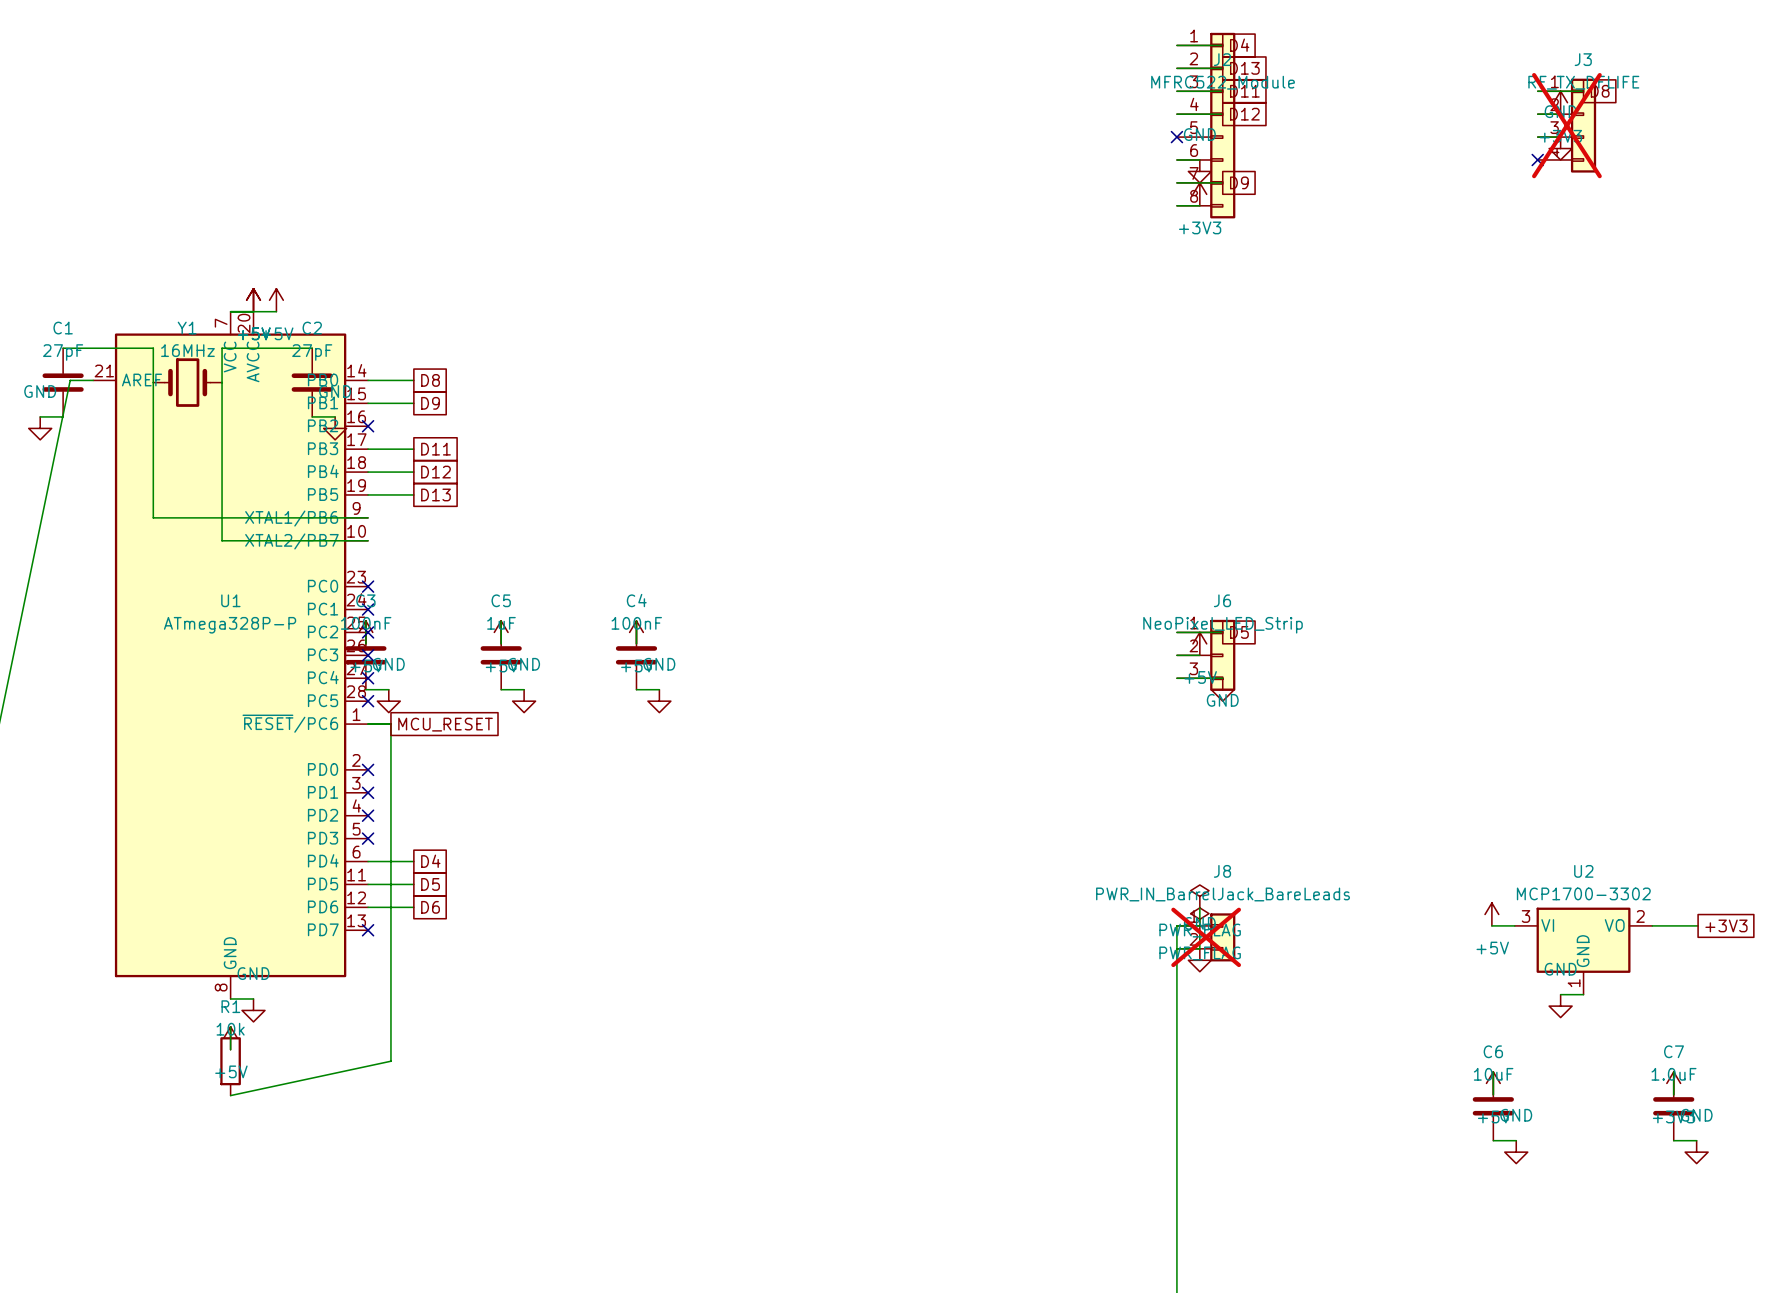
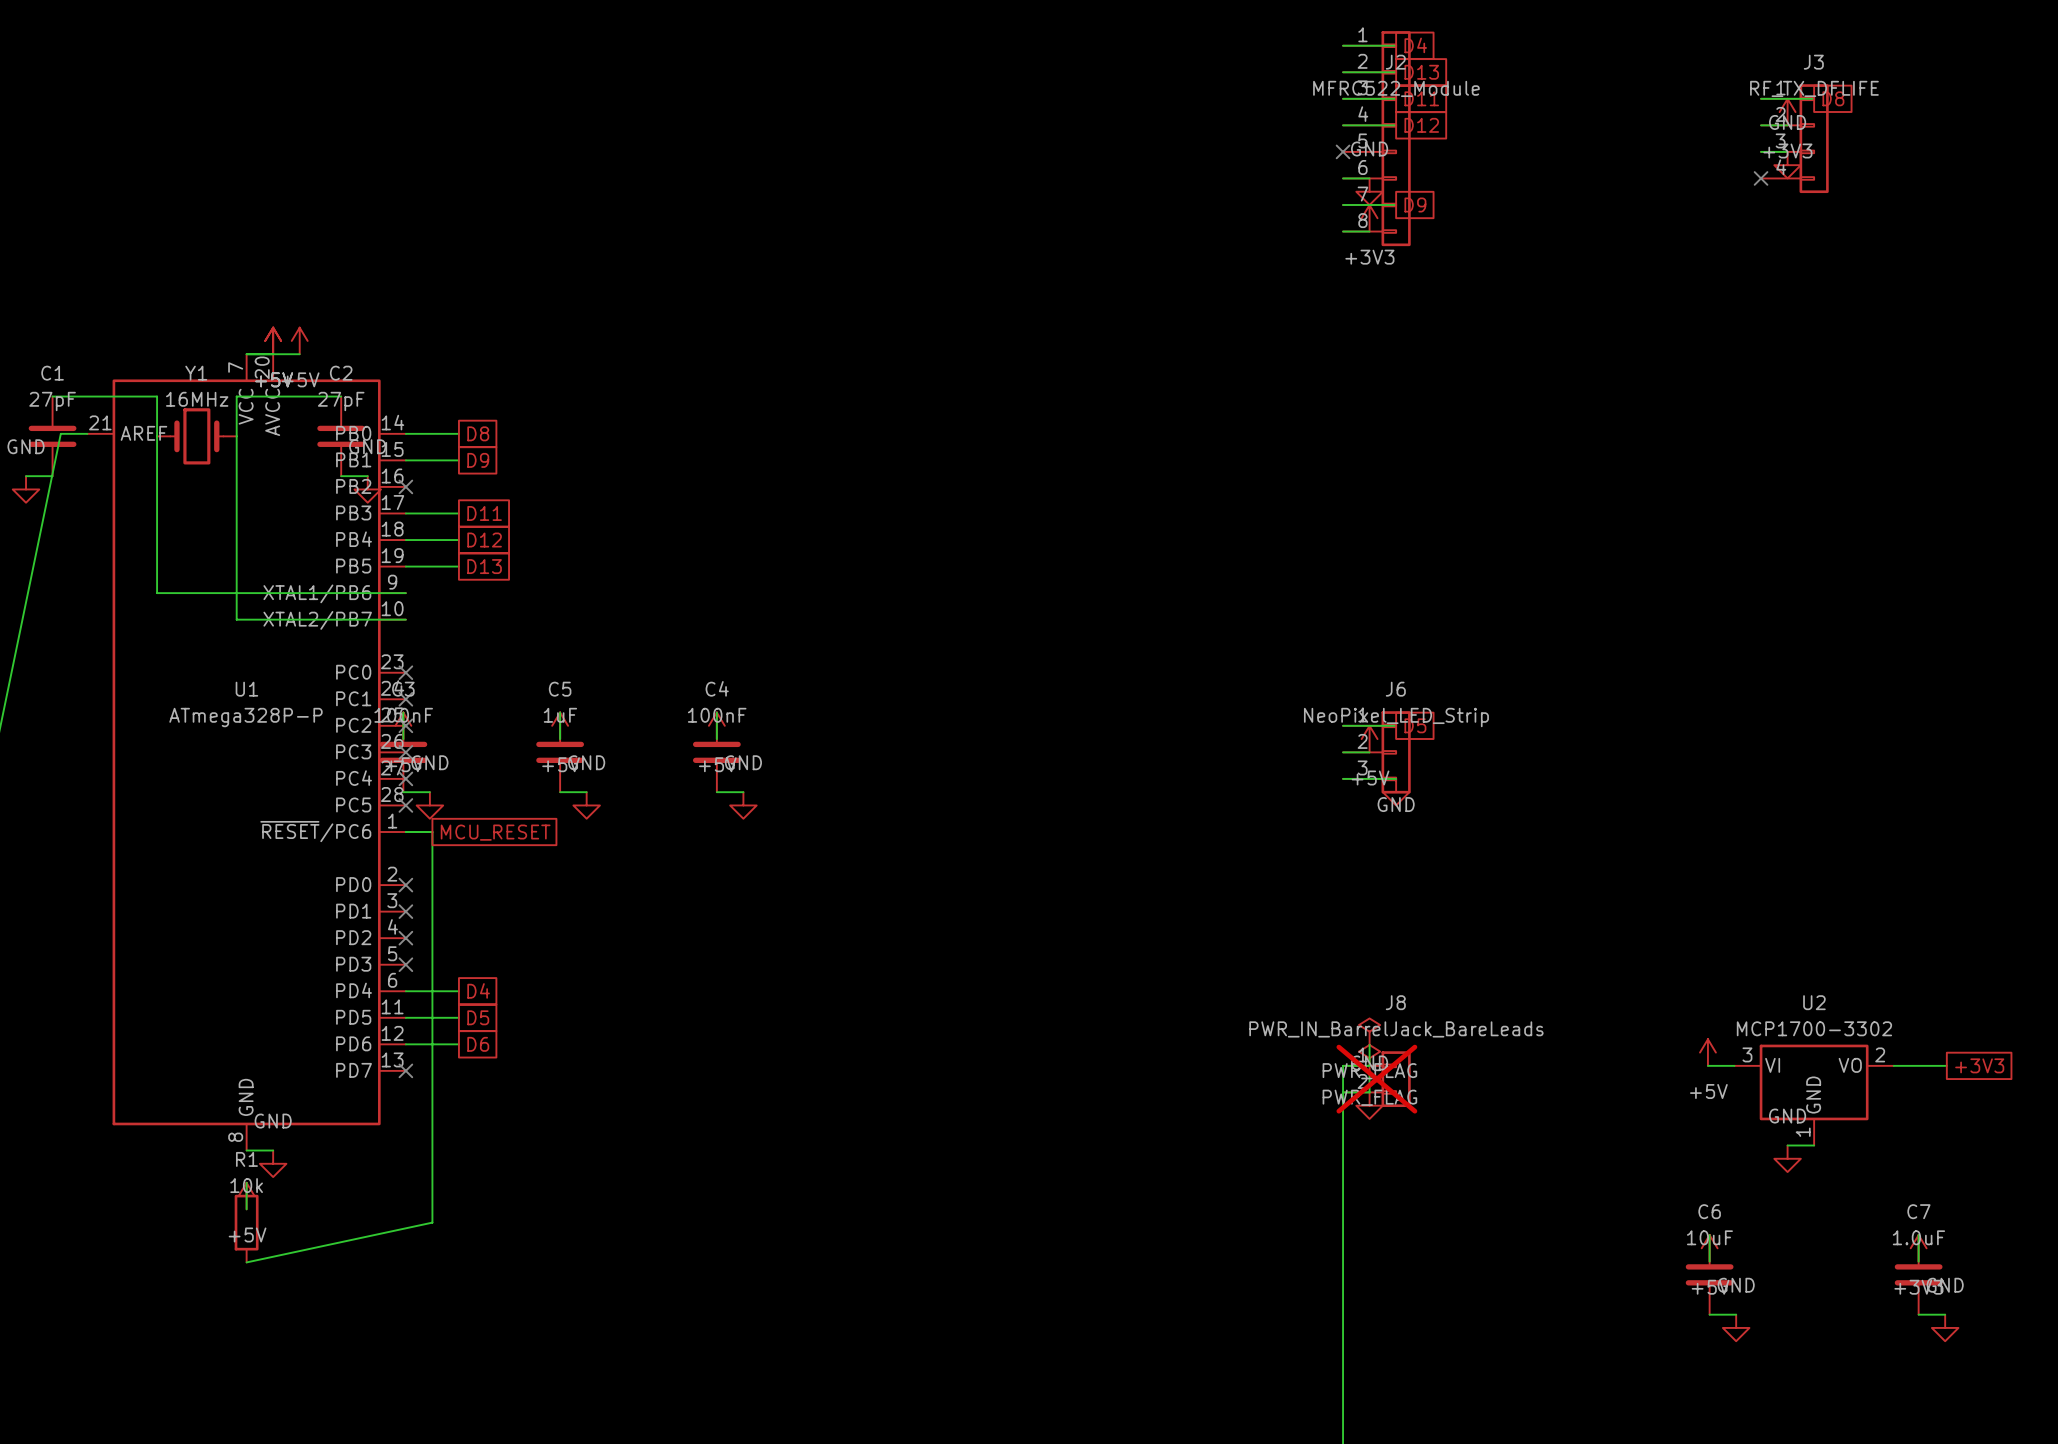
J3 do-not-place cross: (1566, 125) -> none

